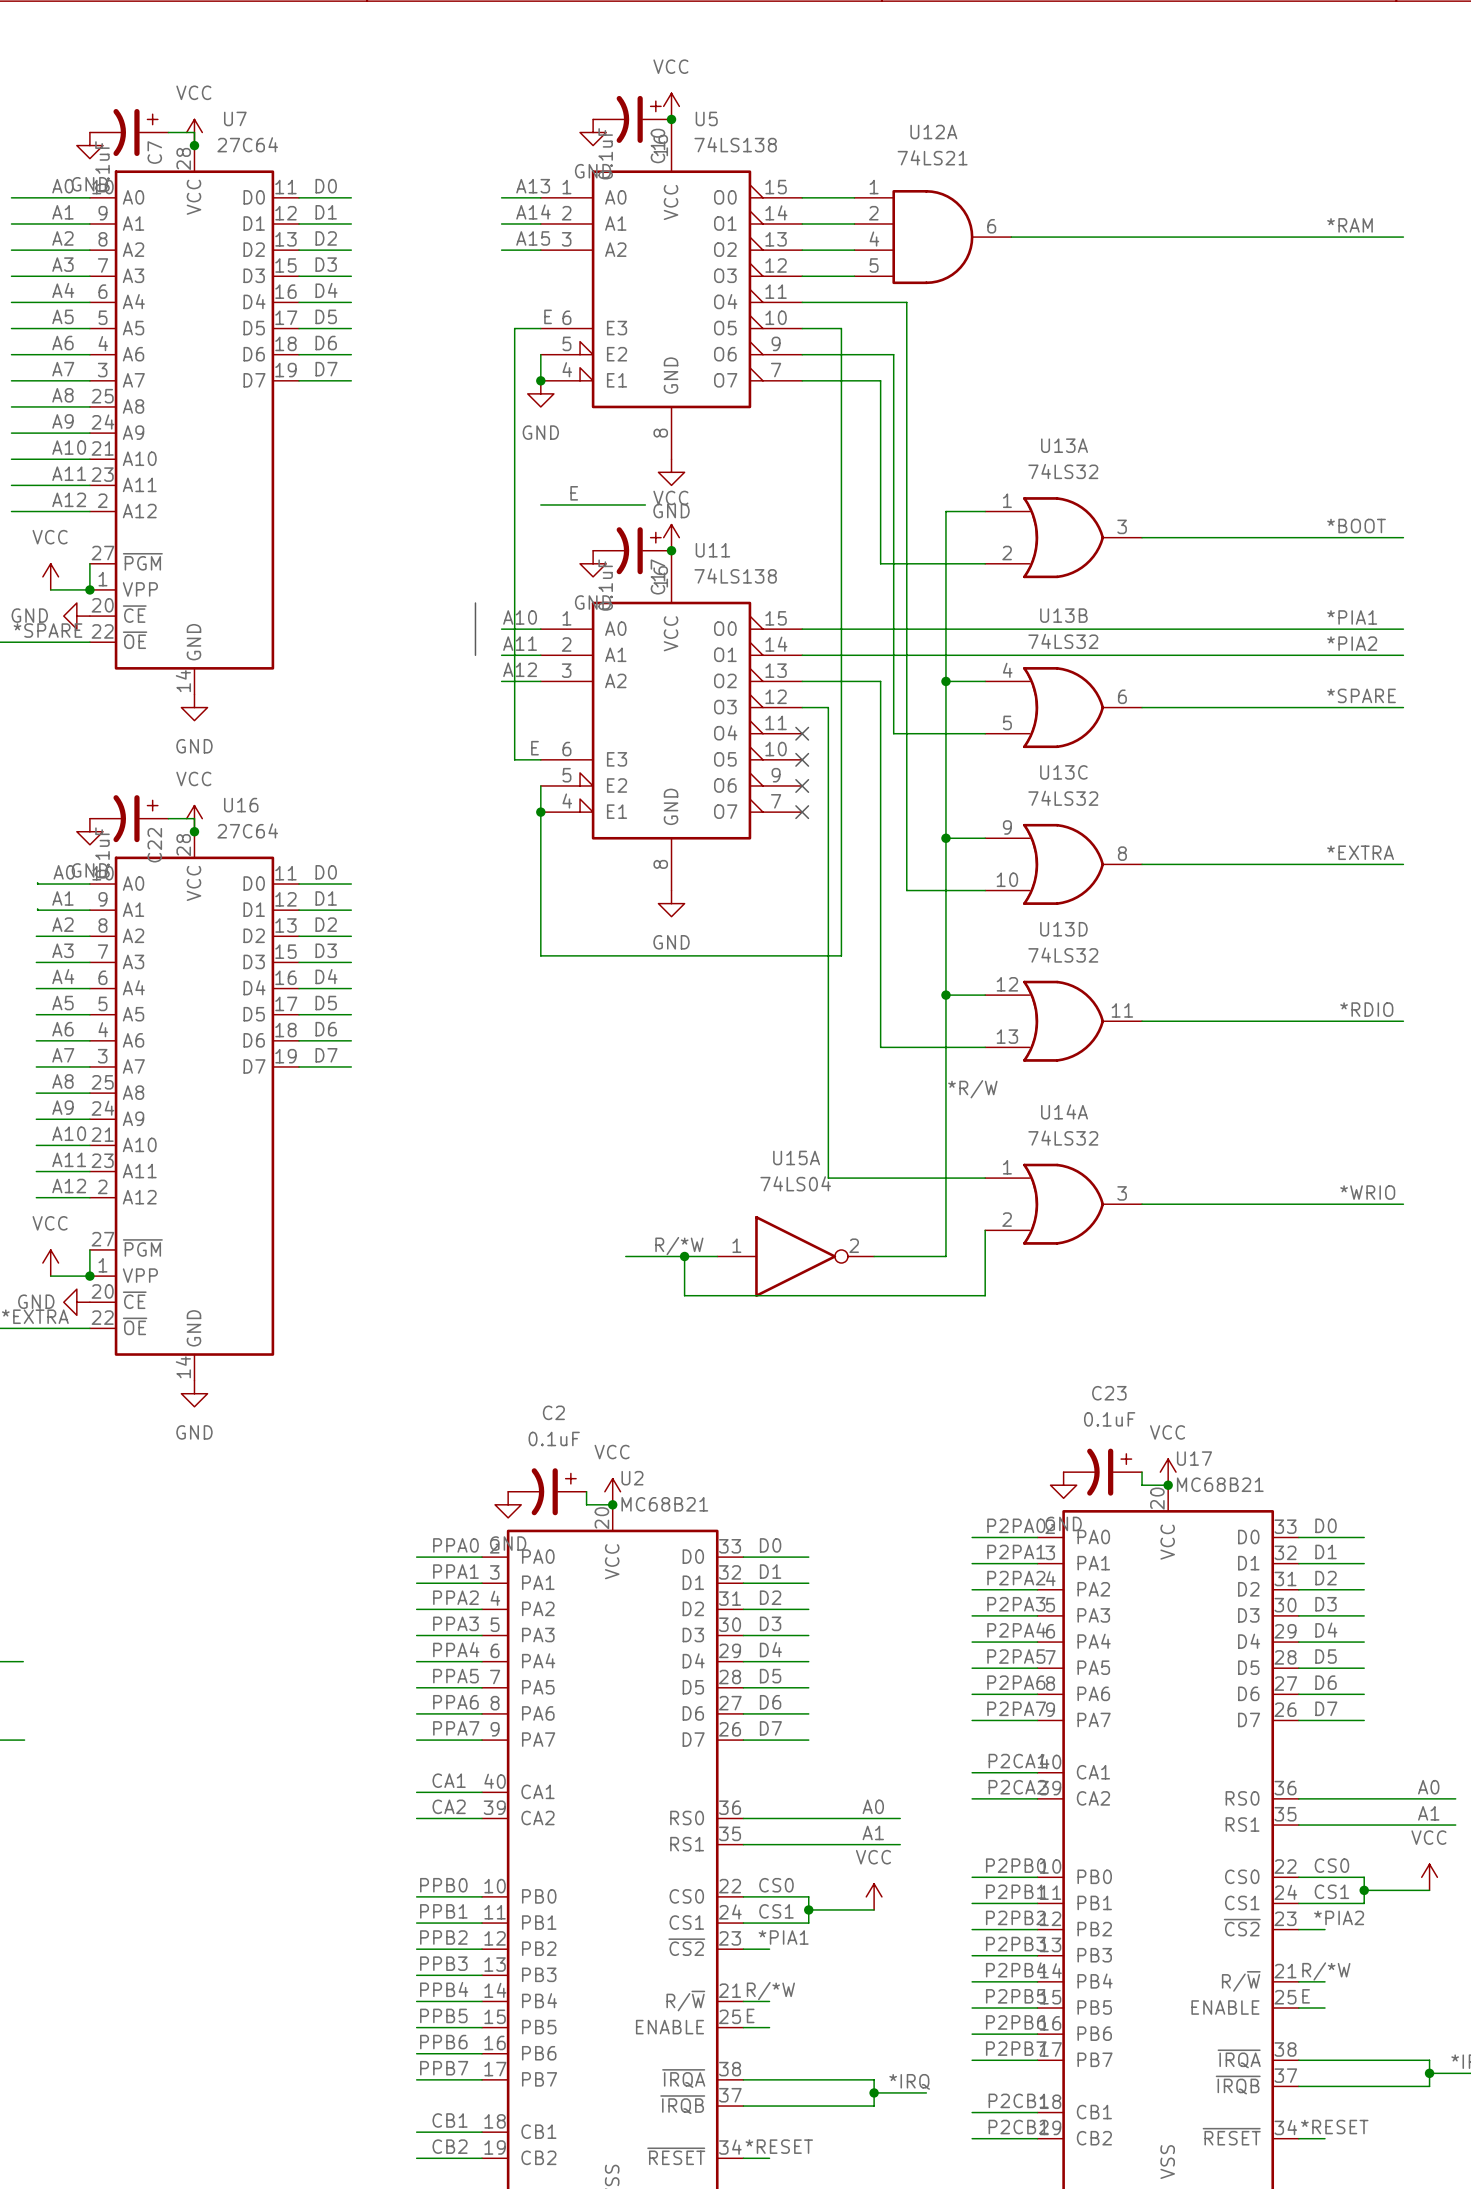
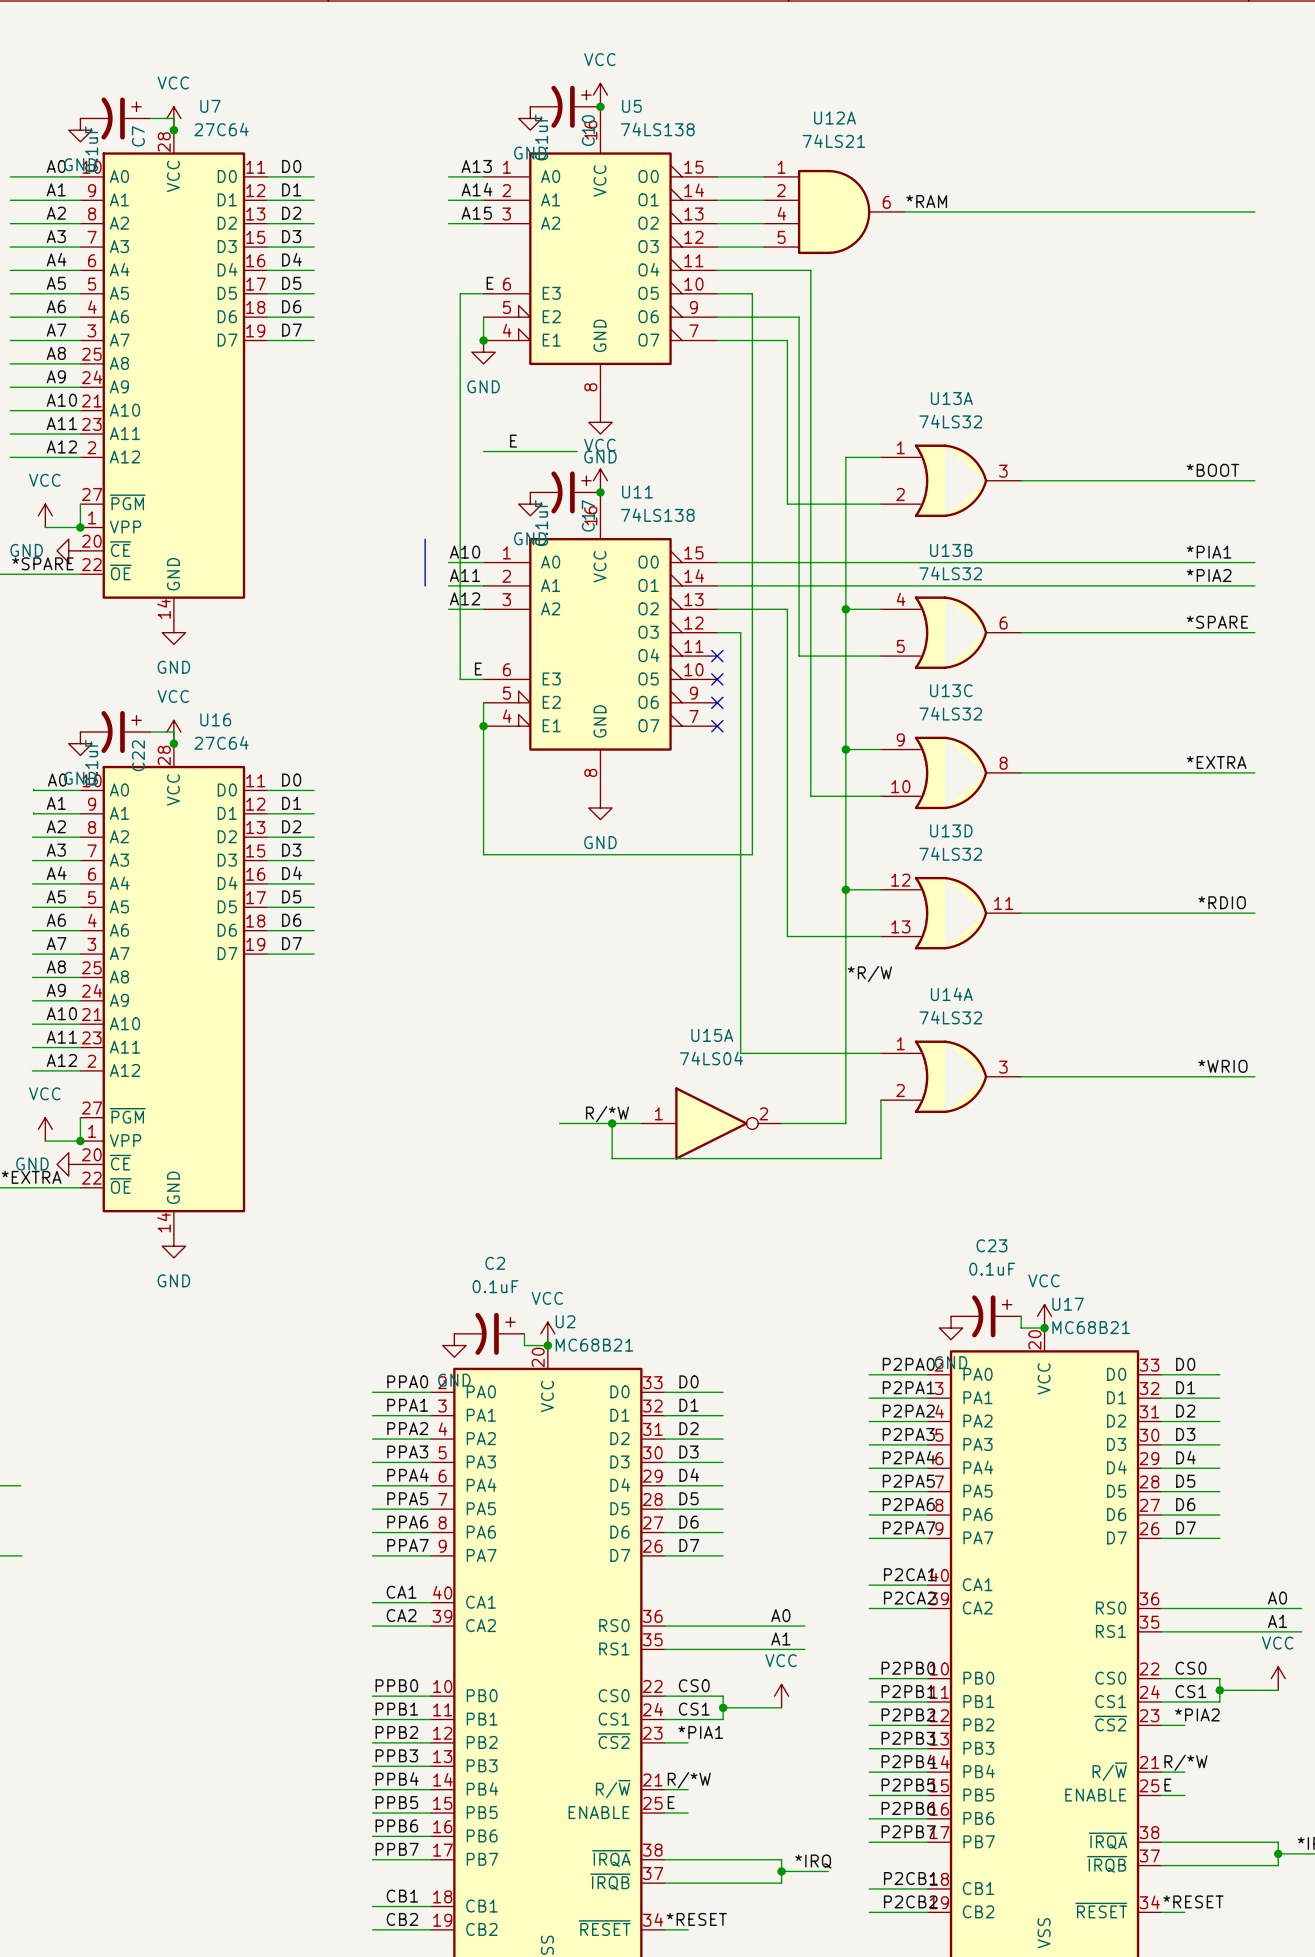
label: none -> *RAM (926, 201)
label: *RAM (1349, 225) -> none

